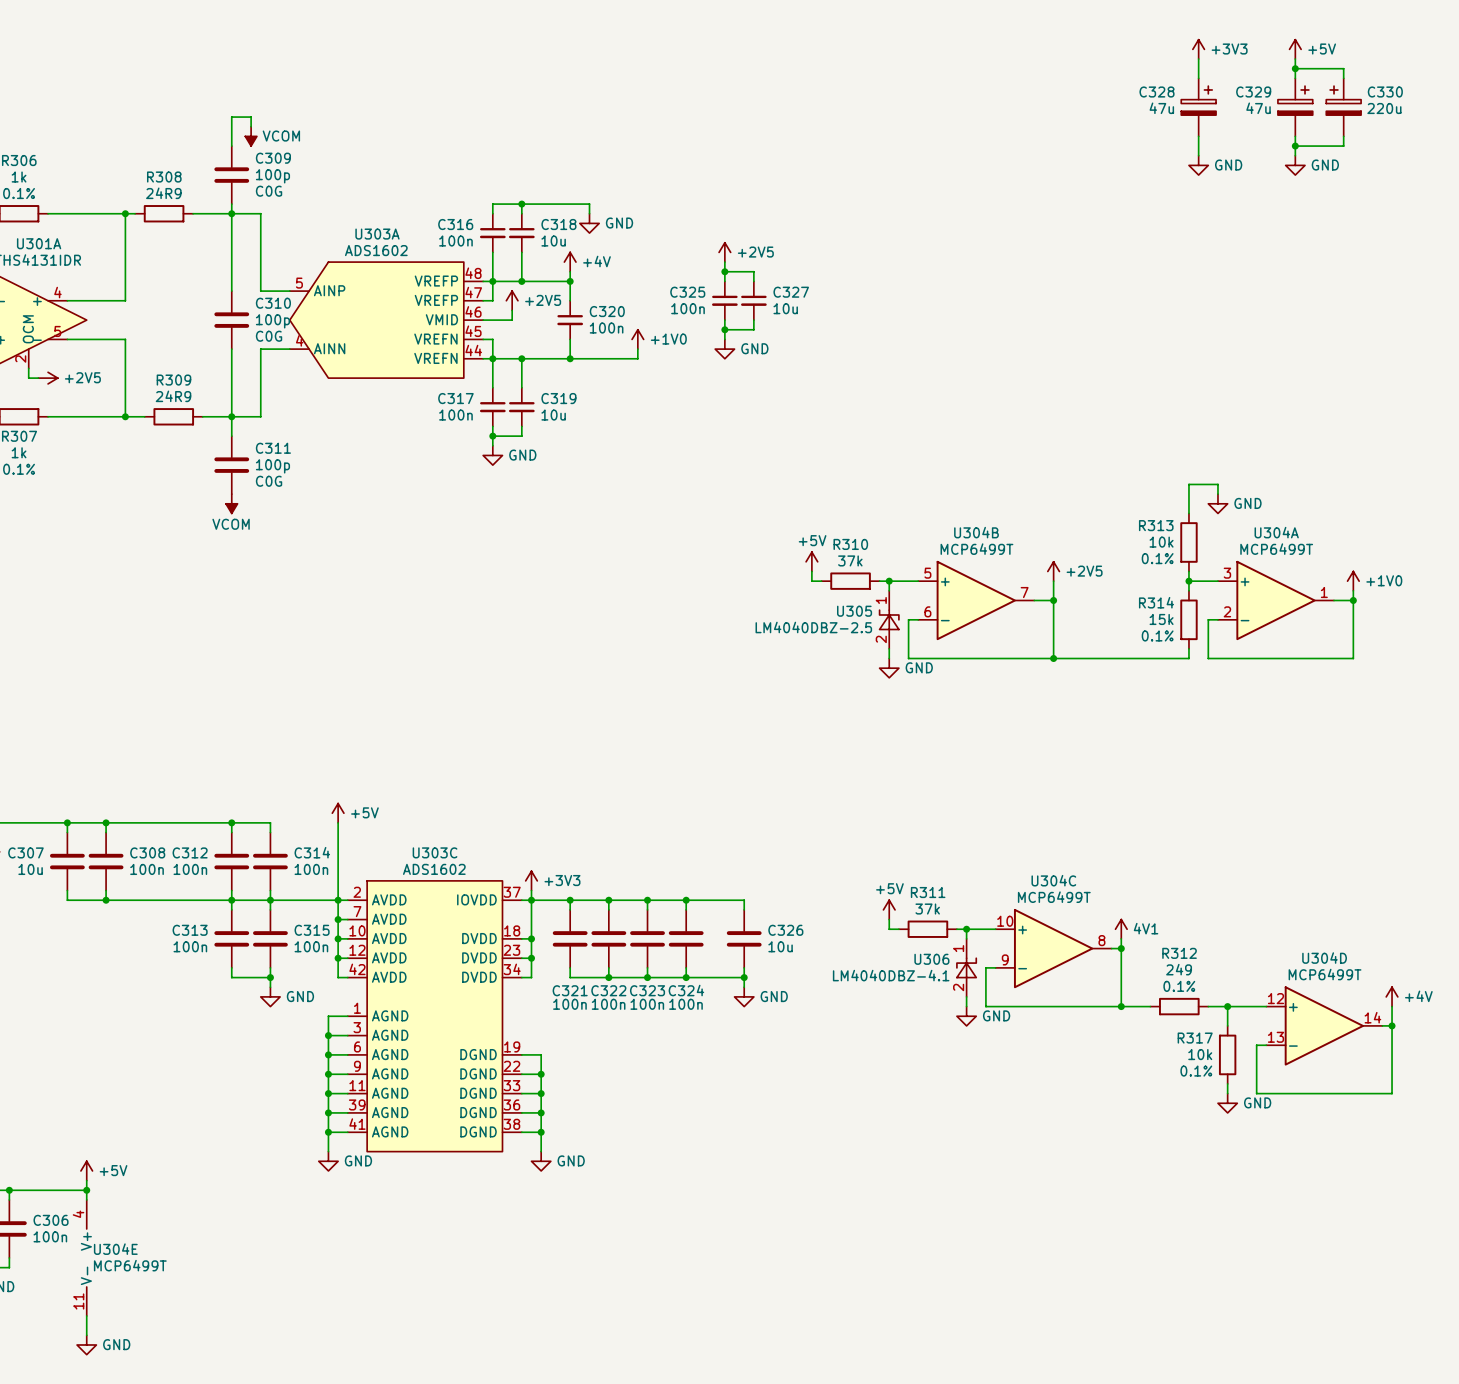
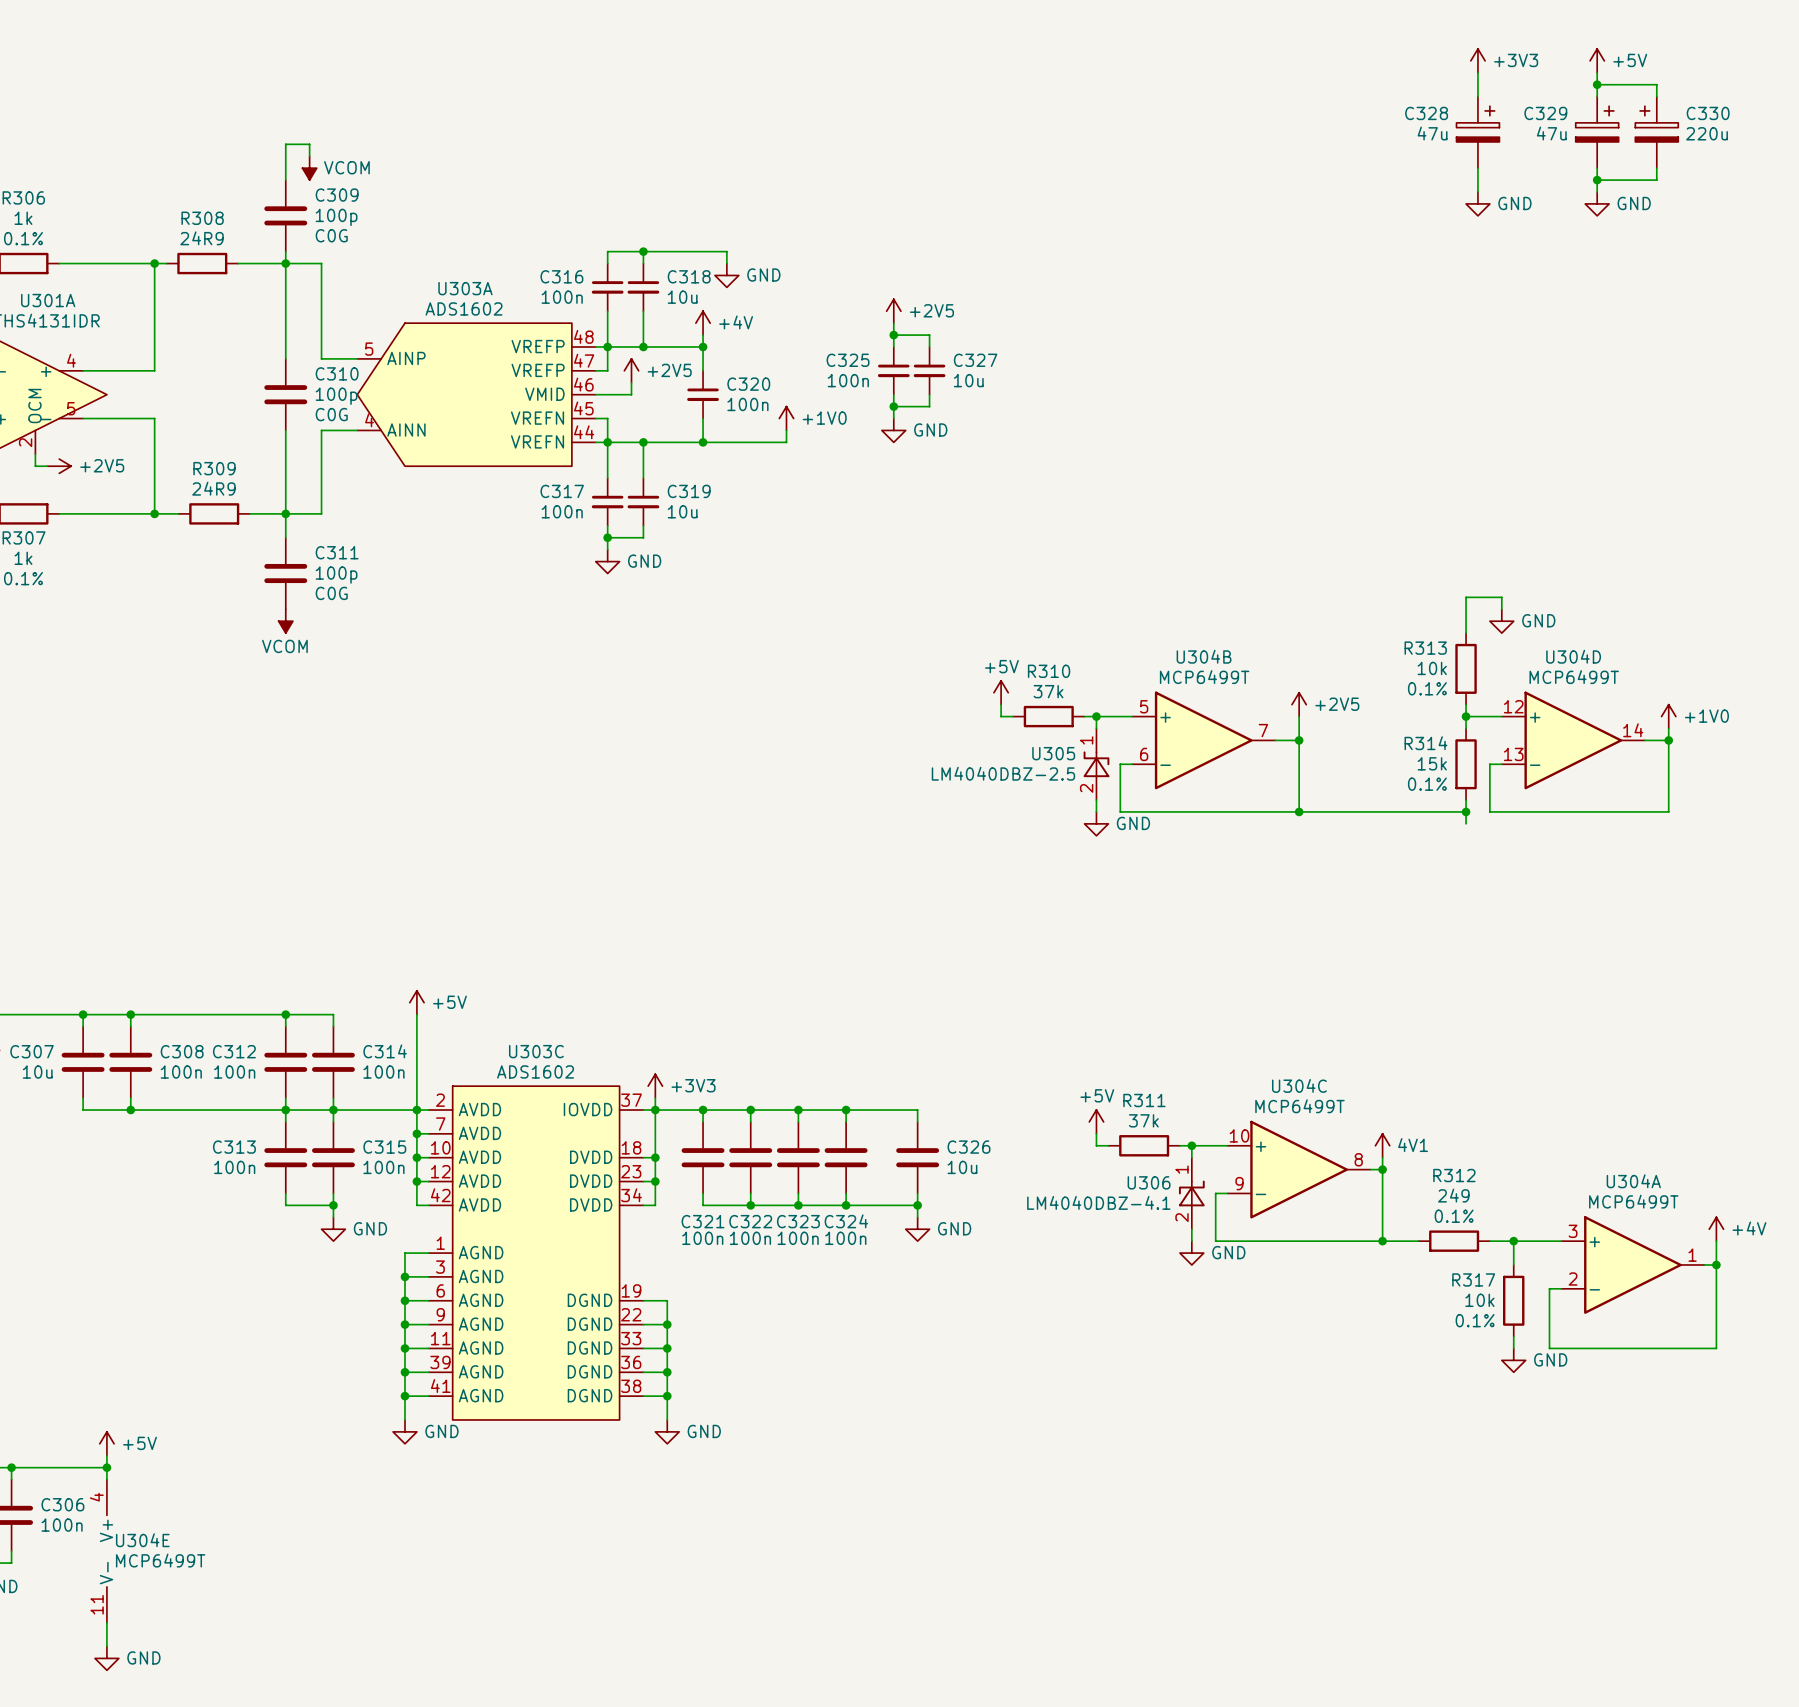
U304A position: (1275, 600) -> (1632, 1264)
wire: none -> (1466, 811) (1466, 823)
junction: none -> (1466, 811)
U304D position: (1324, 1025) -> (1573, 740)

